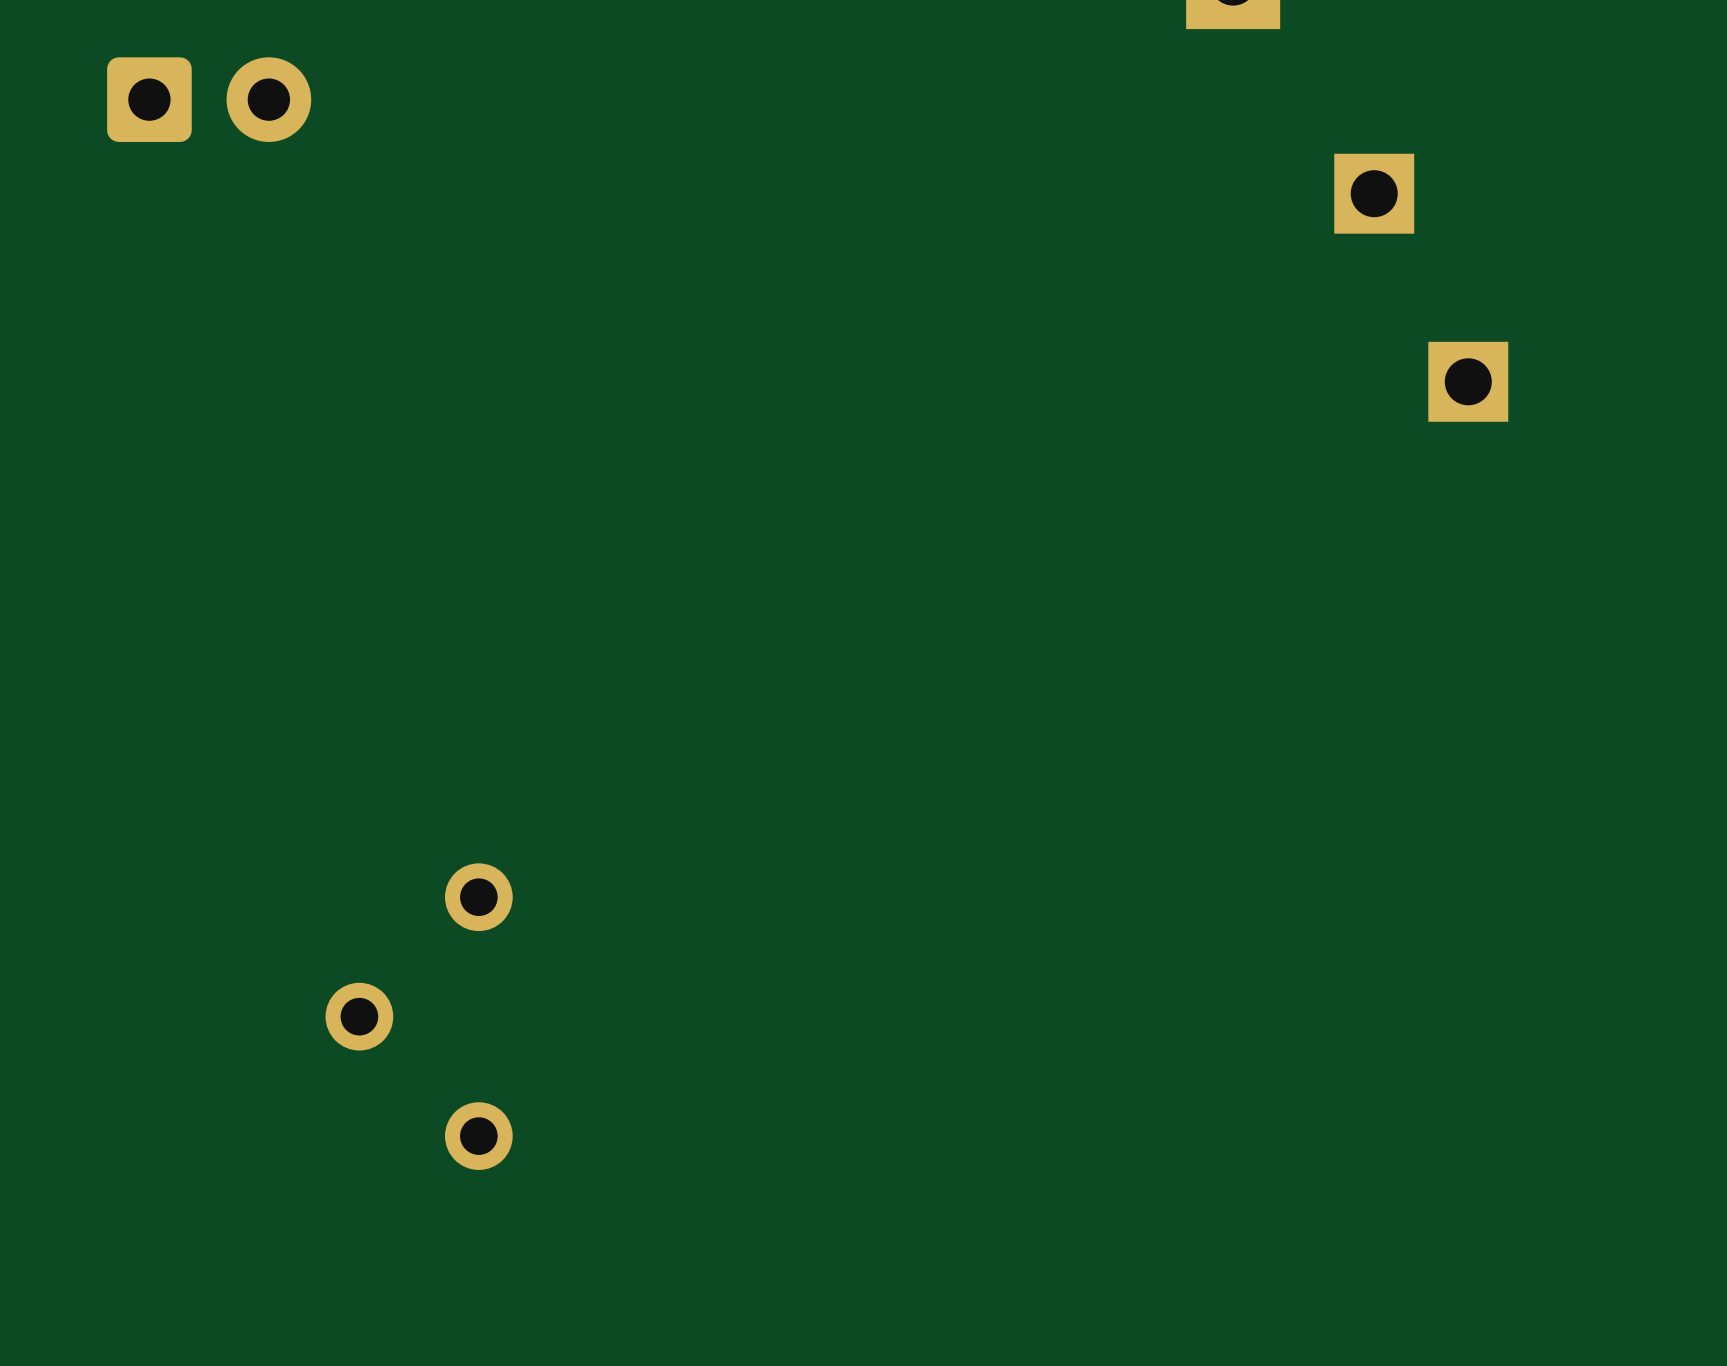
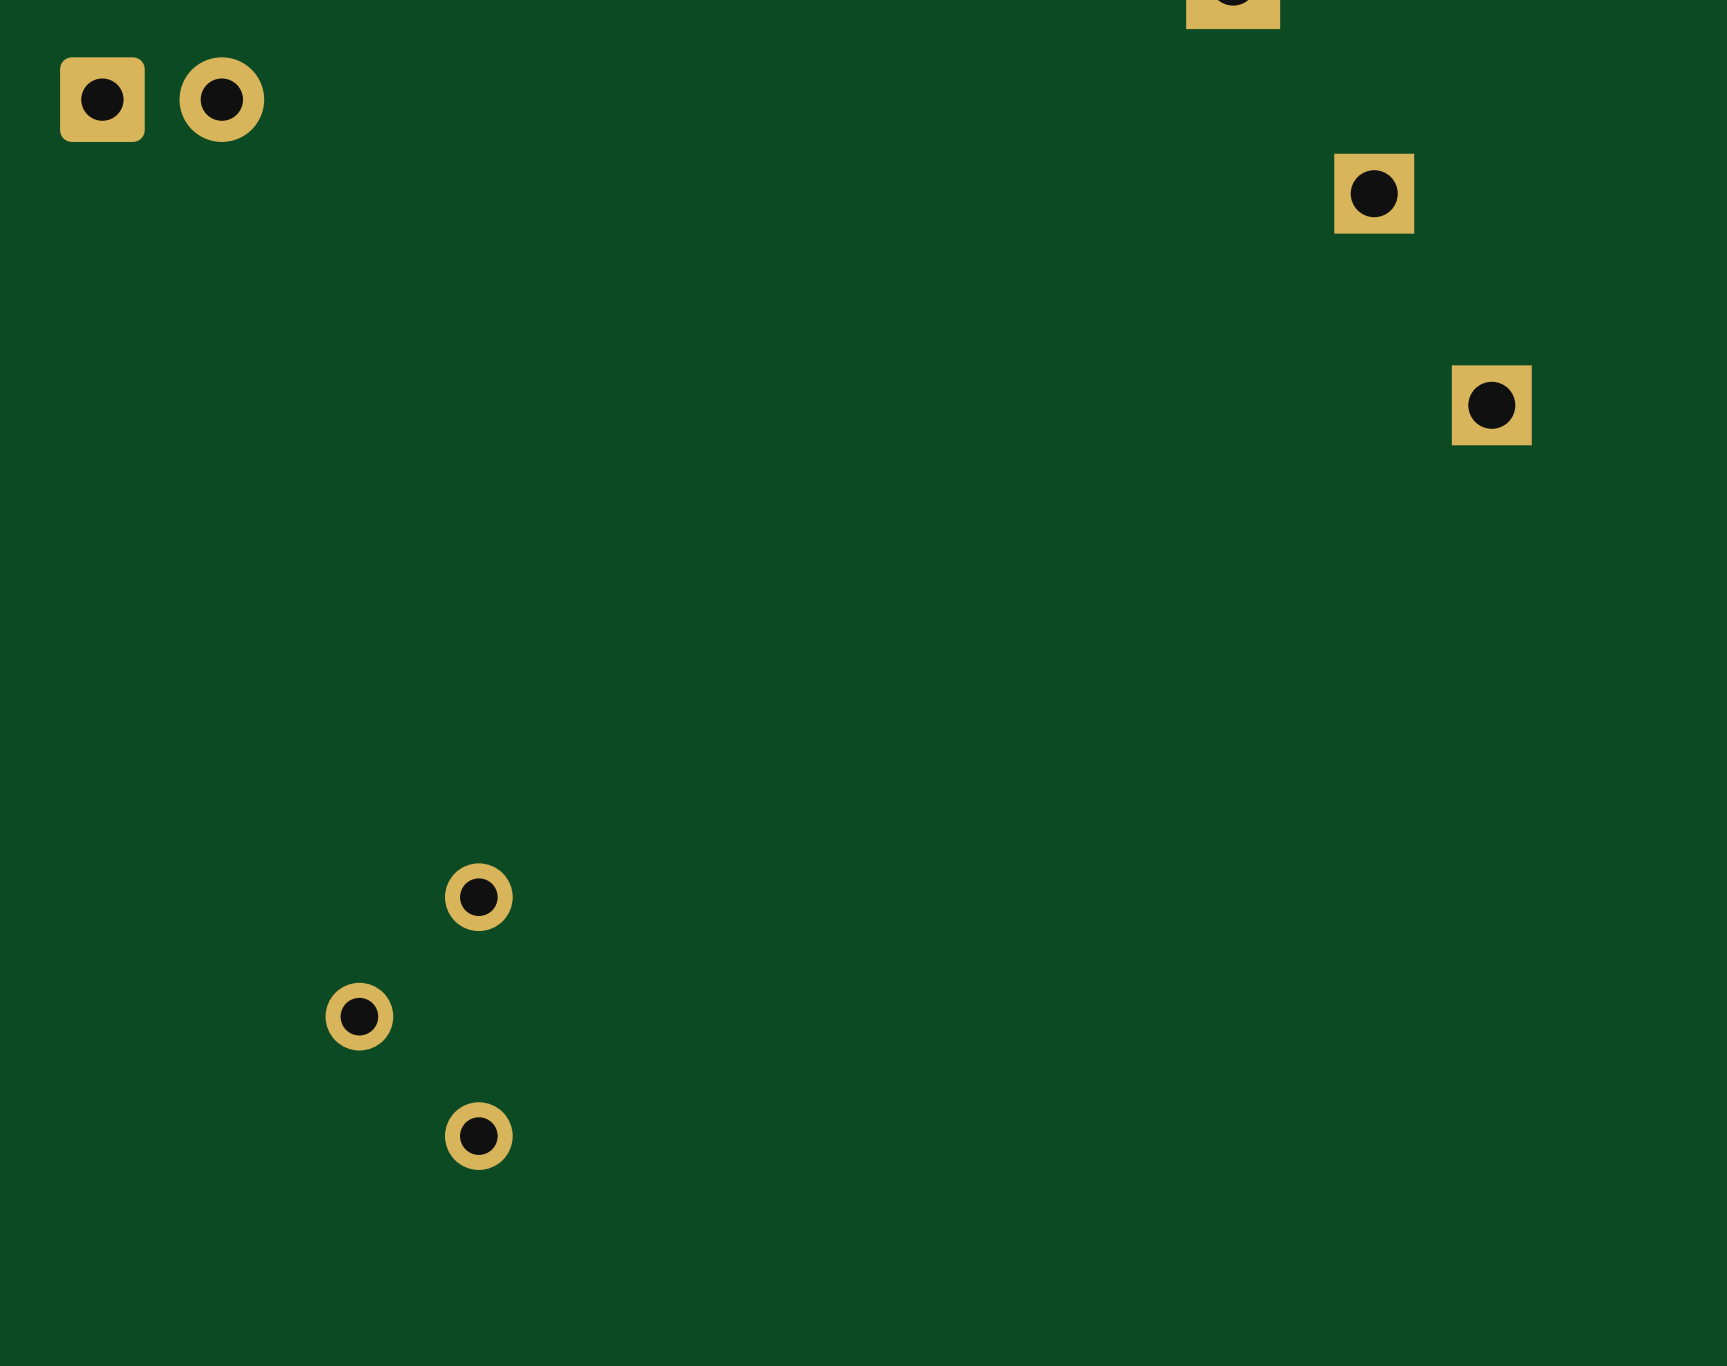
part position: (209, 99) -> (162, 99)
part position: (1468, 381) -> (1491, 405)

